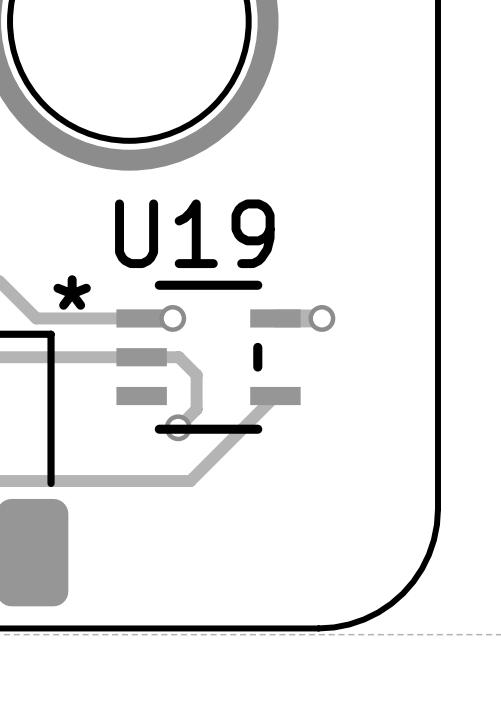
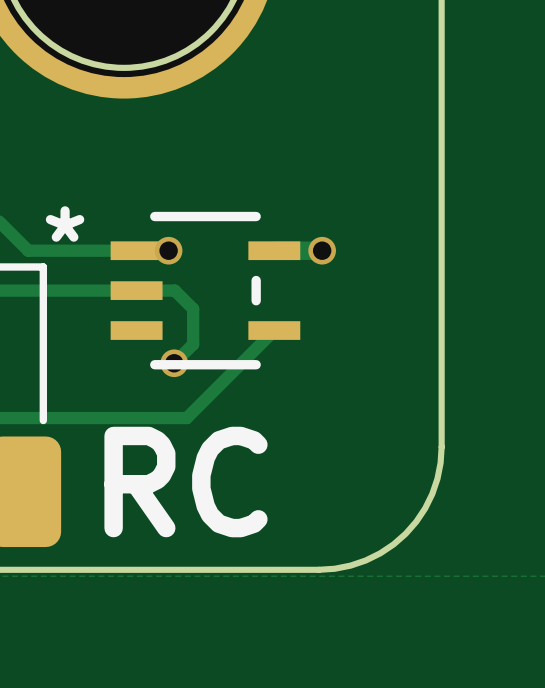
U19 name: U19 (194, 233) -> none
text: none -> RC (186, 482)

